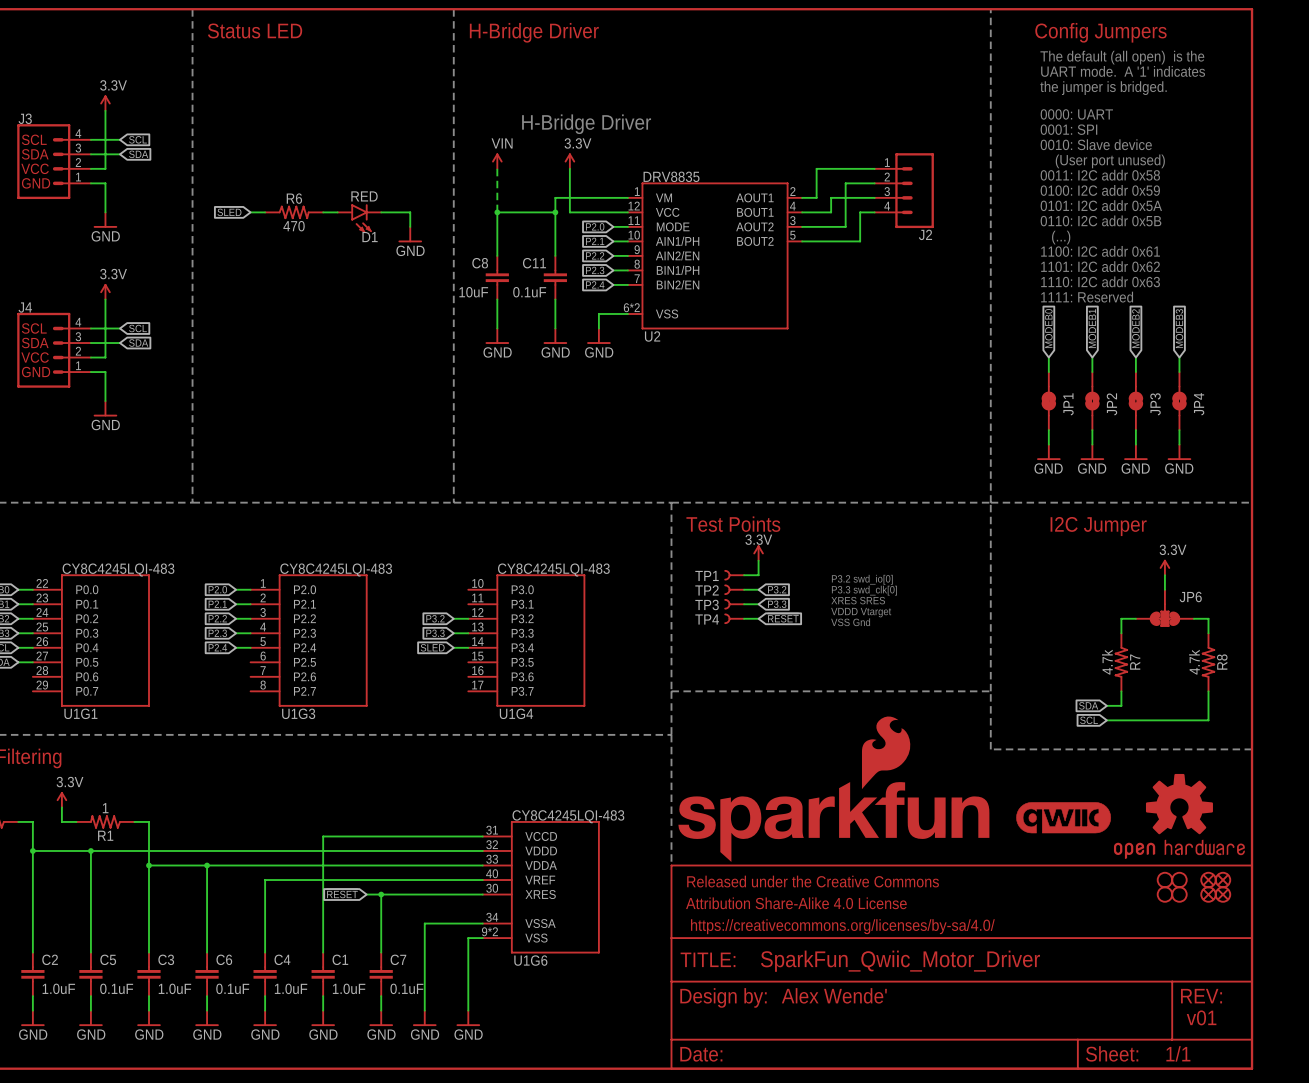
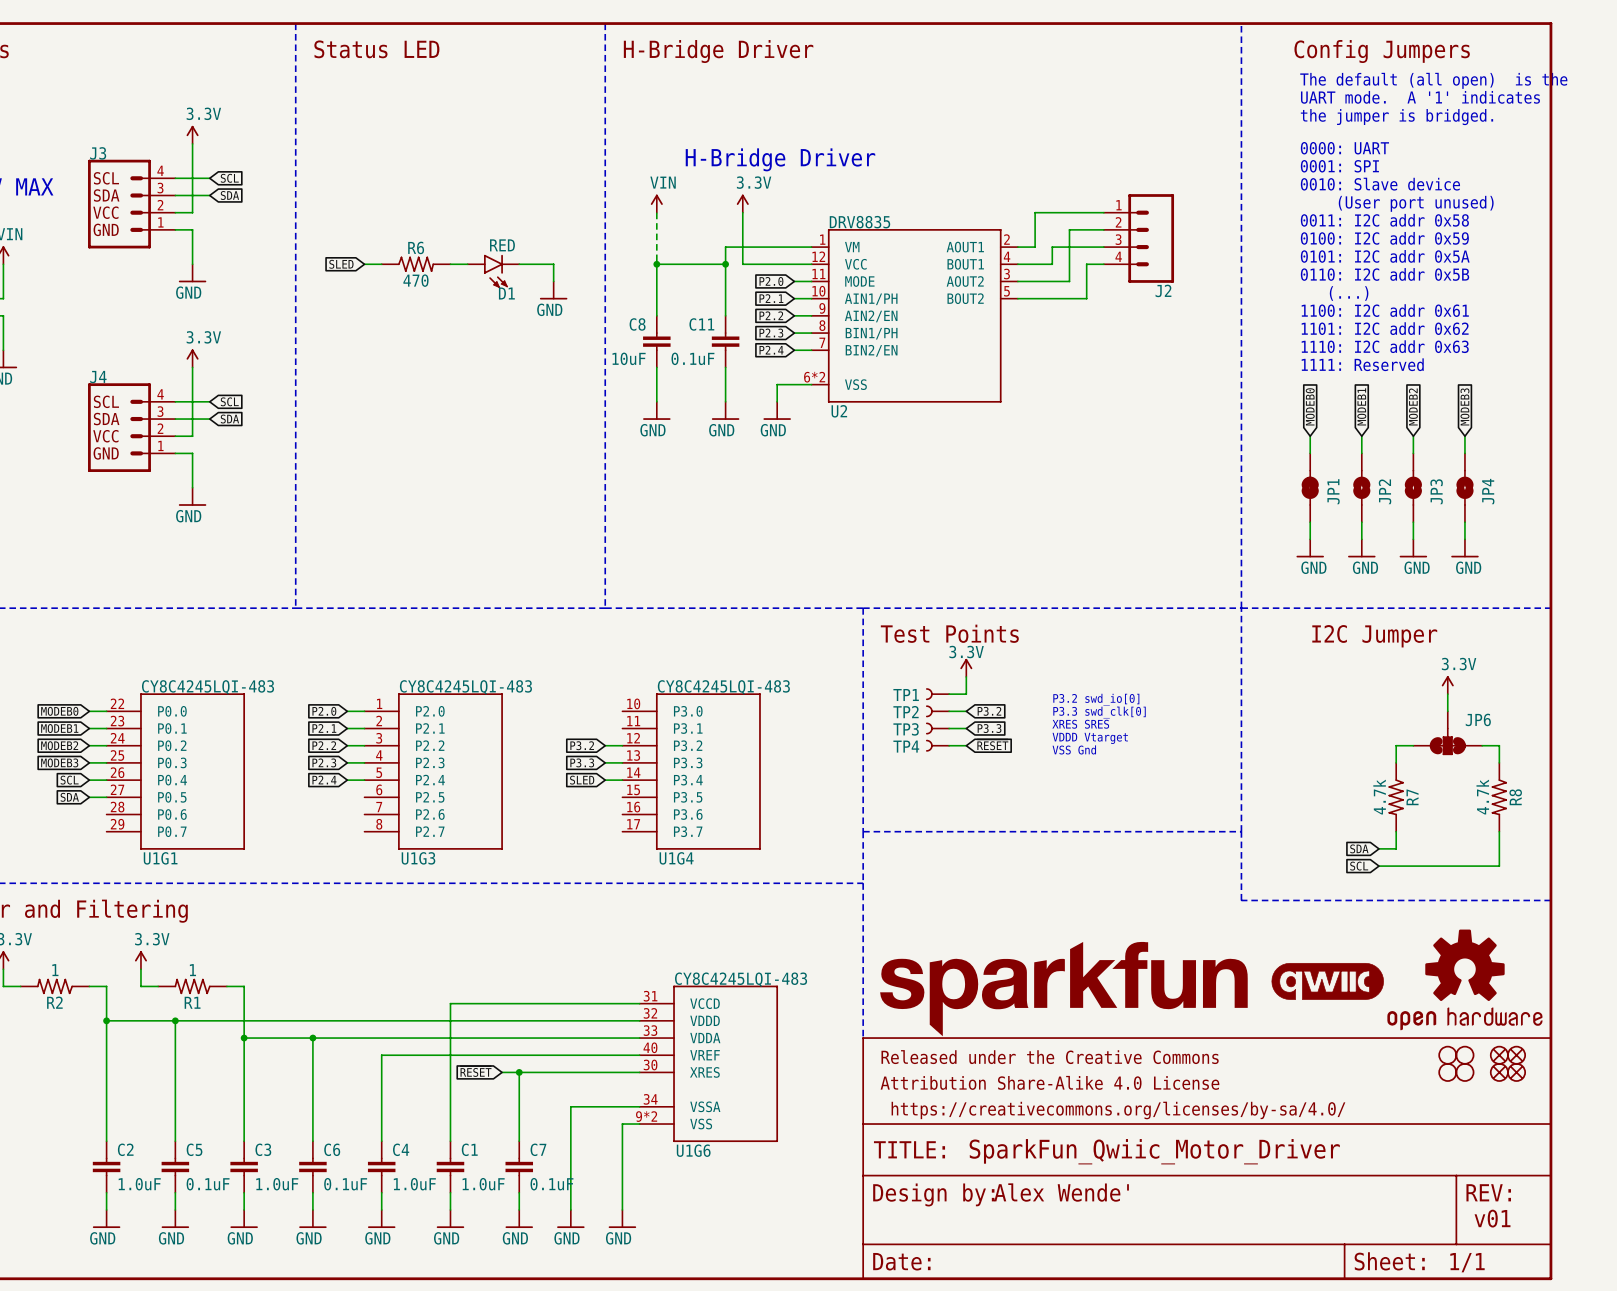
part: (833, 789) -> none
part: none -> (1063, 989)

